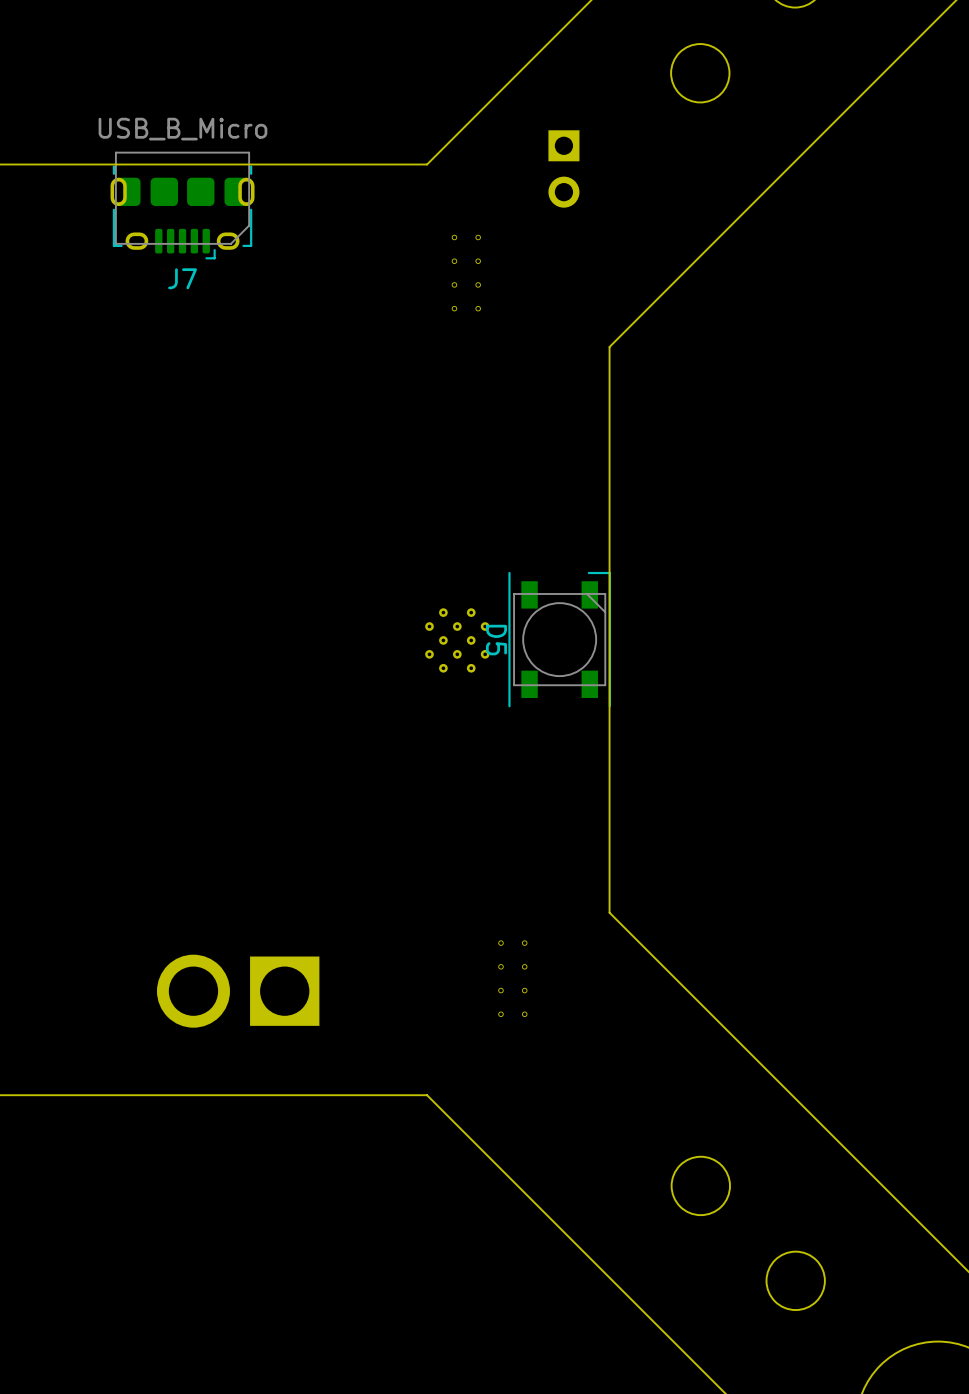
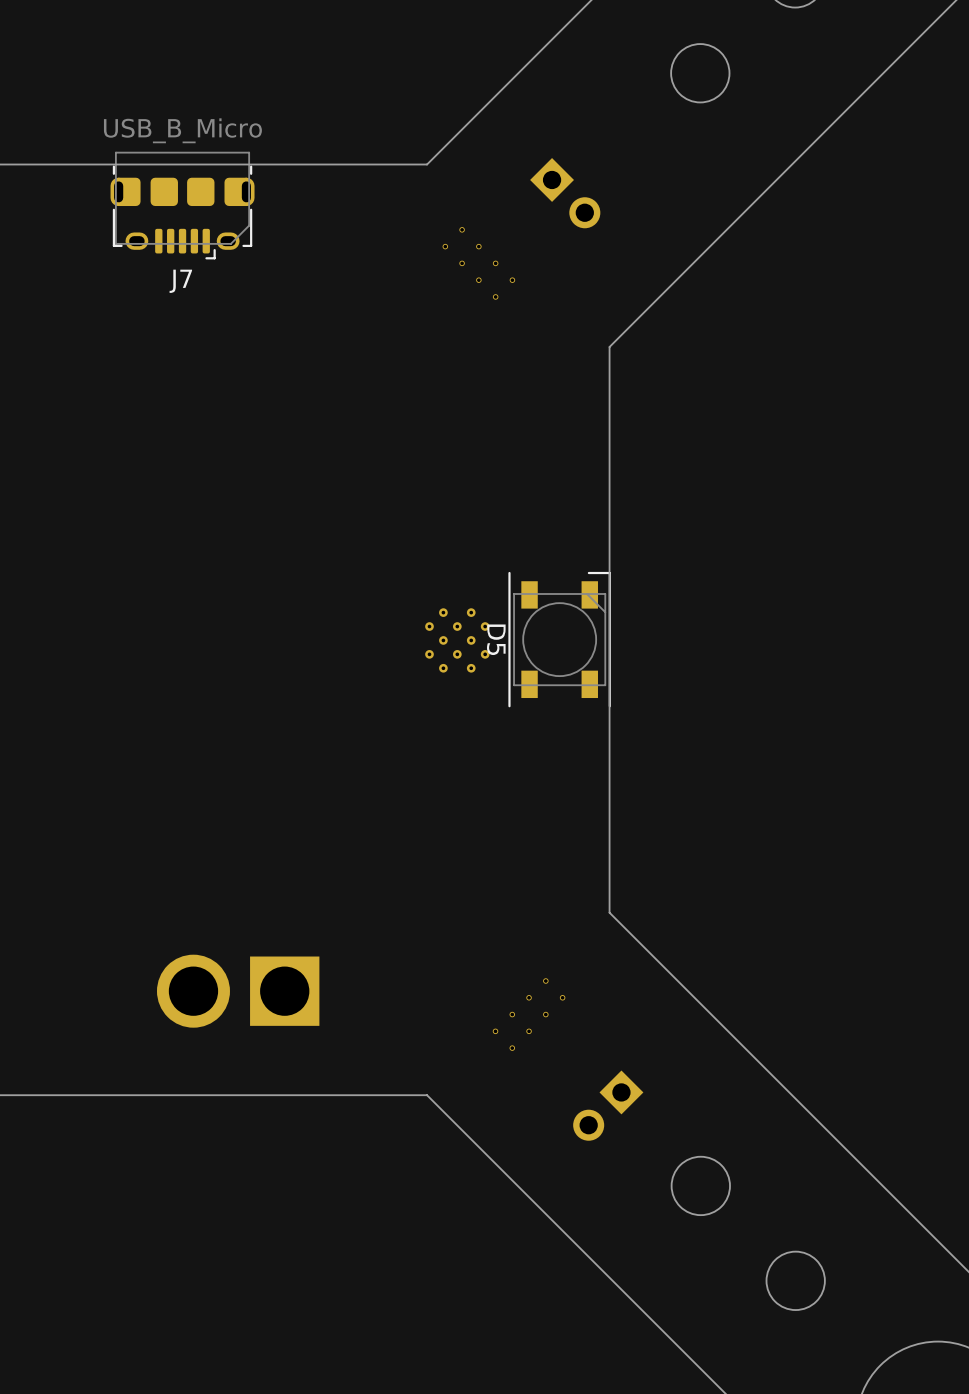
part: (563, 168) -> none
part: none -> (565, 193)
part rotation: 0° (466, 273) -> 45° counterclockwise (478, 263)
part: (512, 978) -> none
part: none -> (529, 1014)
part: none -> (608, 1105)

